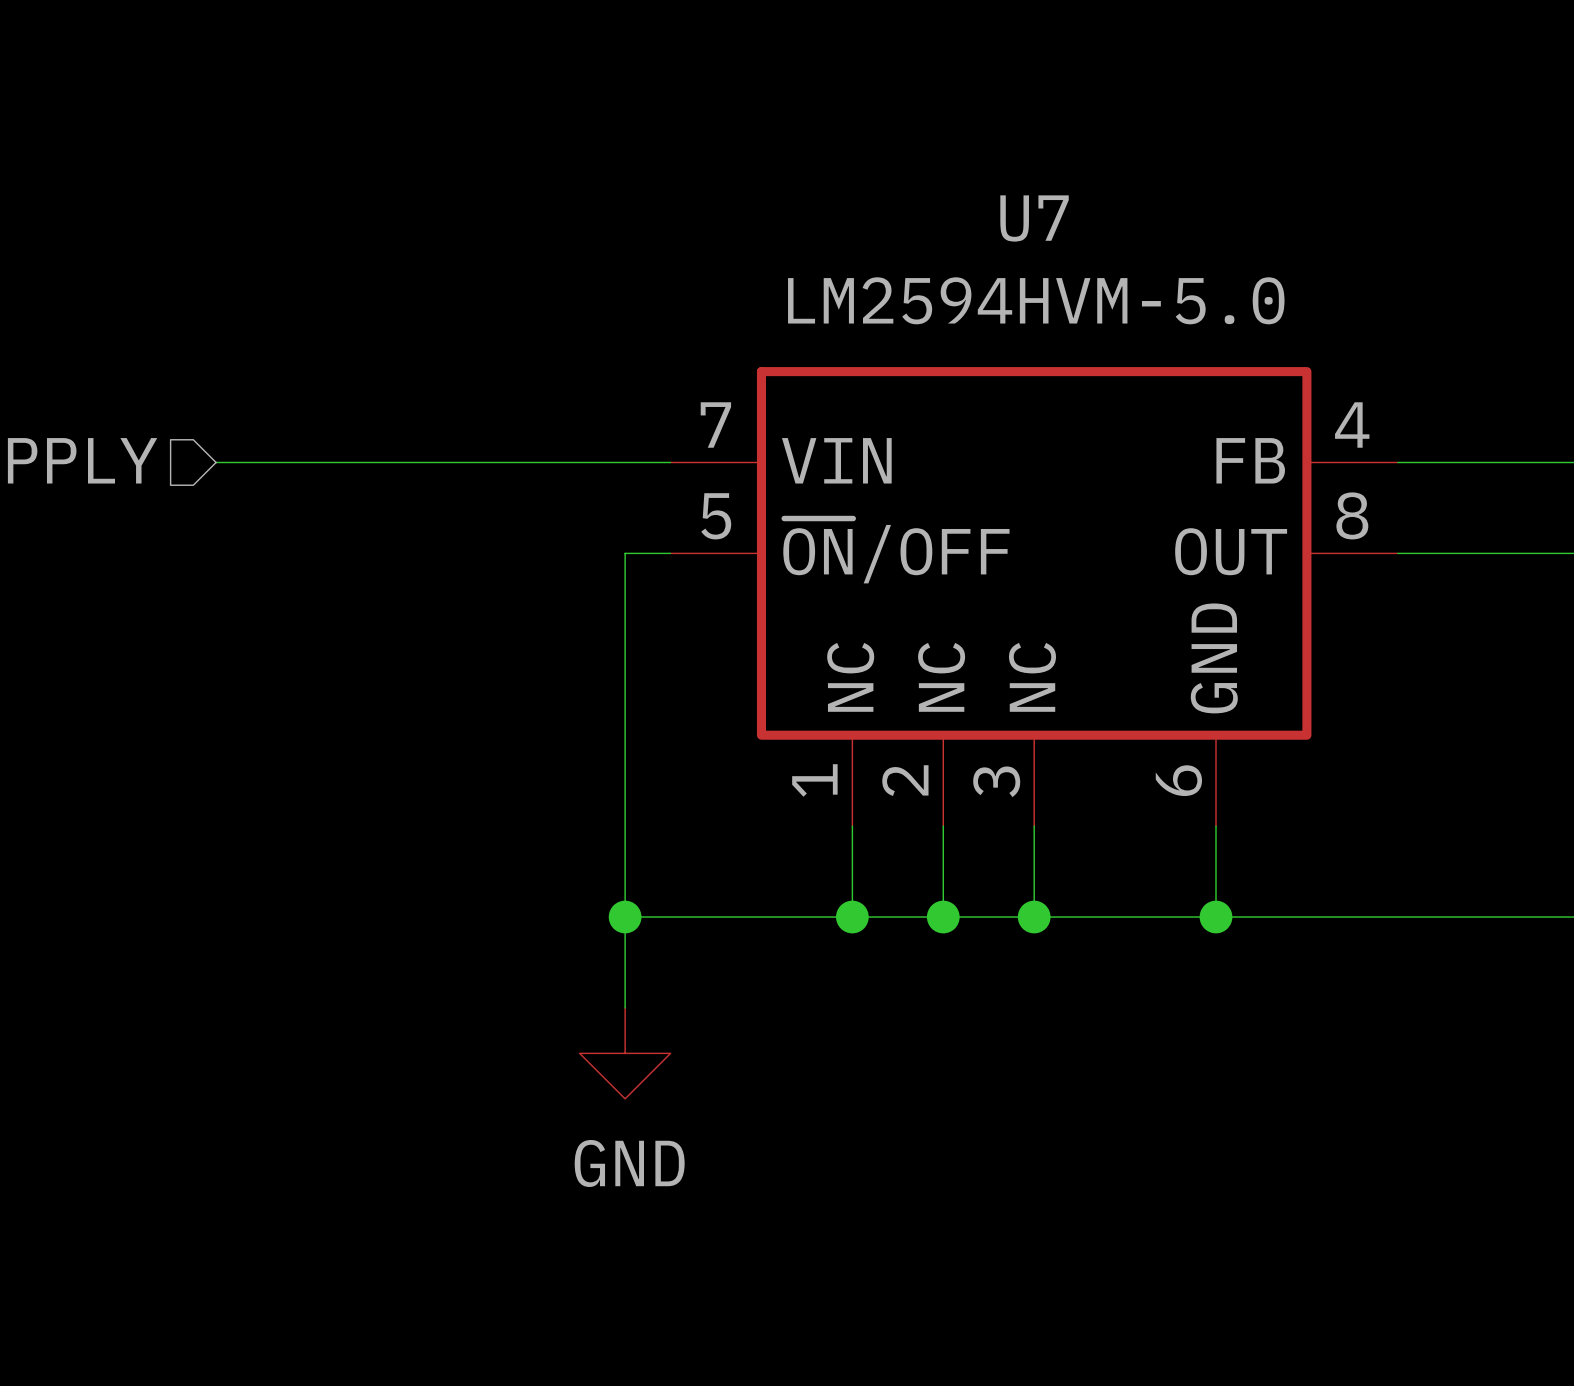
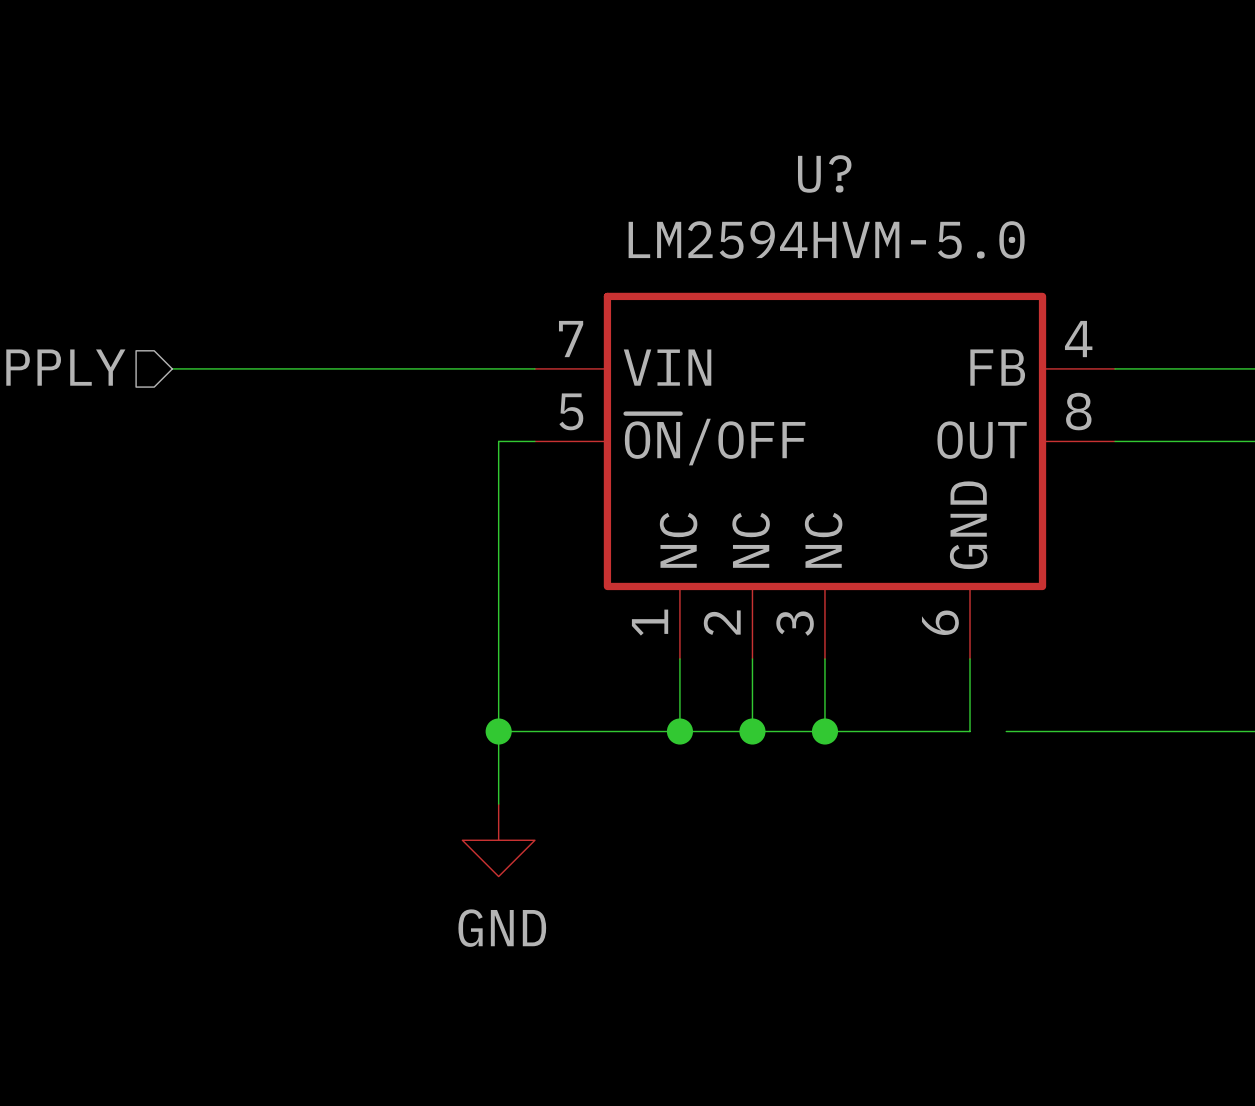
U7 name: U7 (1034, 218) -> U? (824, 173)
wire: (1216, 917) (1261, 917) -> none
junction: (1216, 917) -> none

